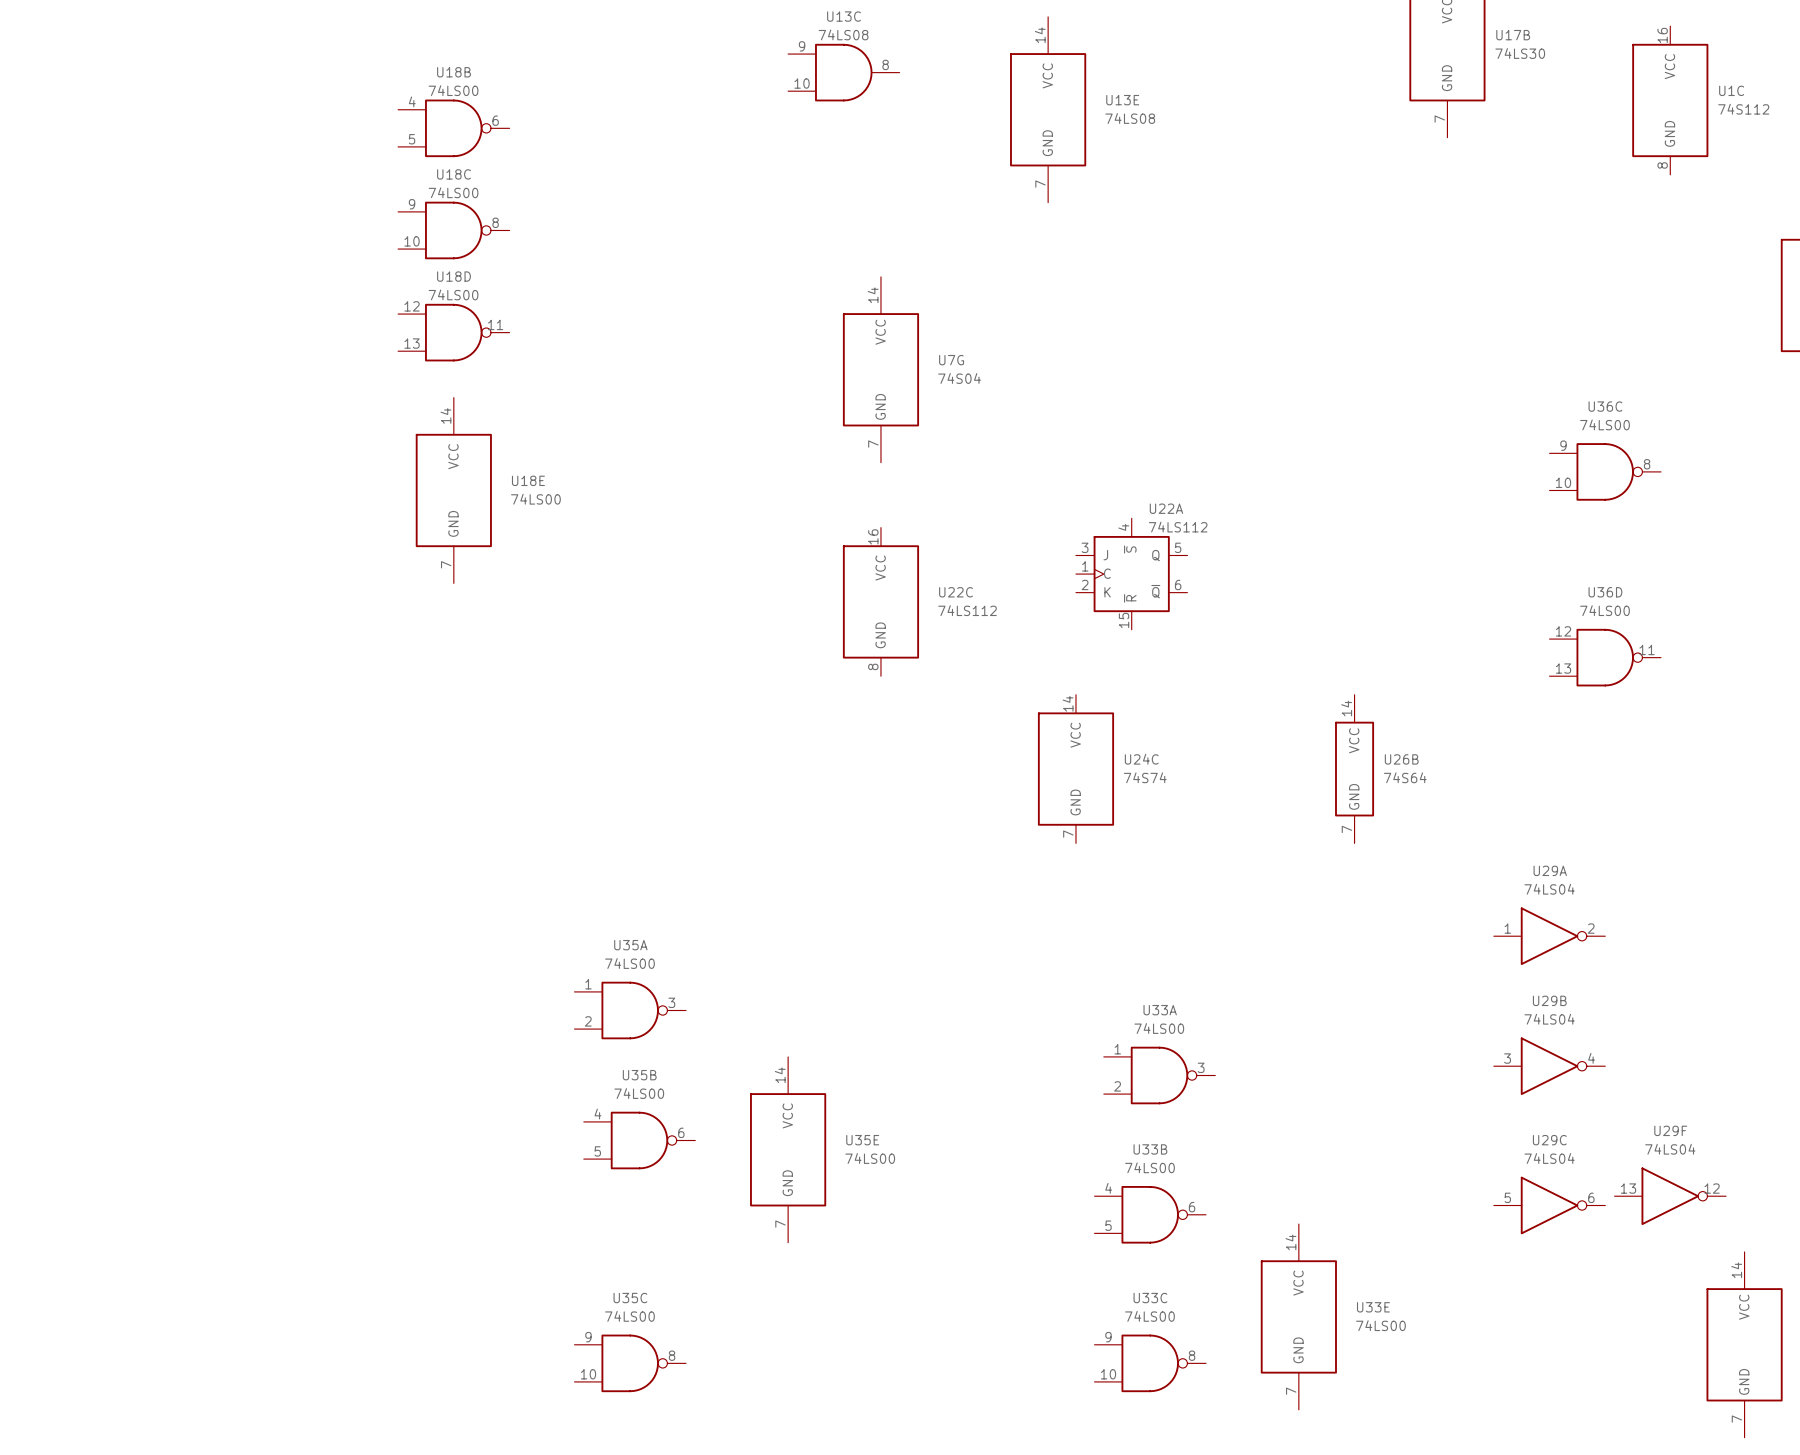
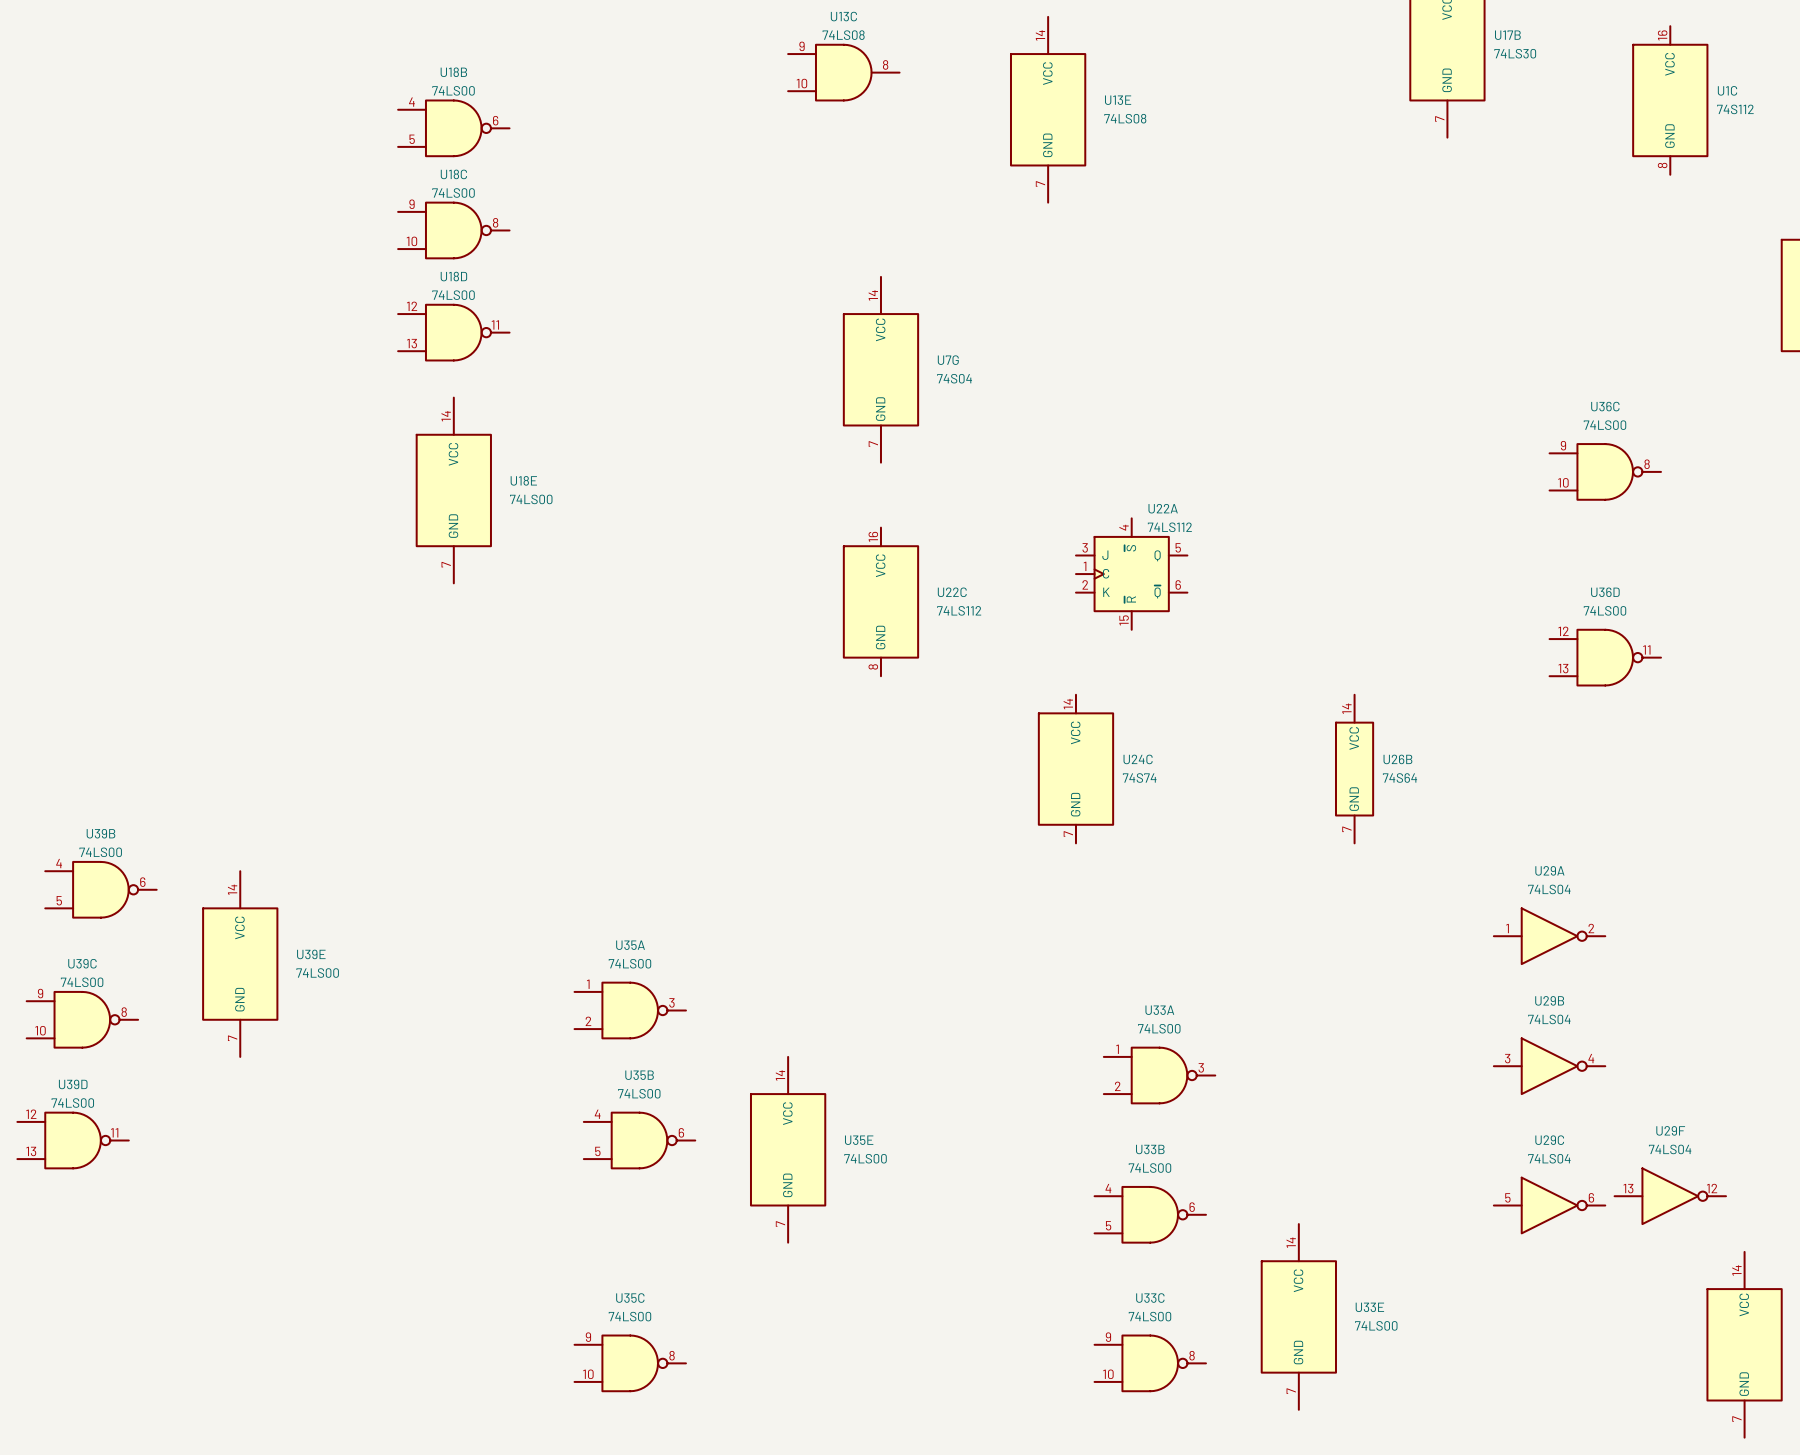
U39B: none -> 74LS00 (100, 889)
U39E: none -> 74LS00 (240, 964)
U39C: none -> 74LS00 (82, 1019)
U39D: none -> 74LS00 (73, 1140)

